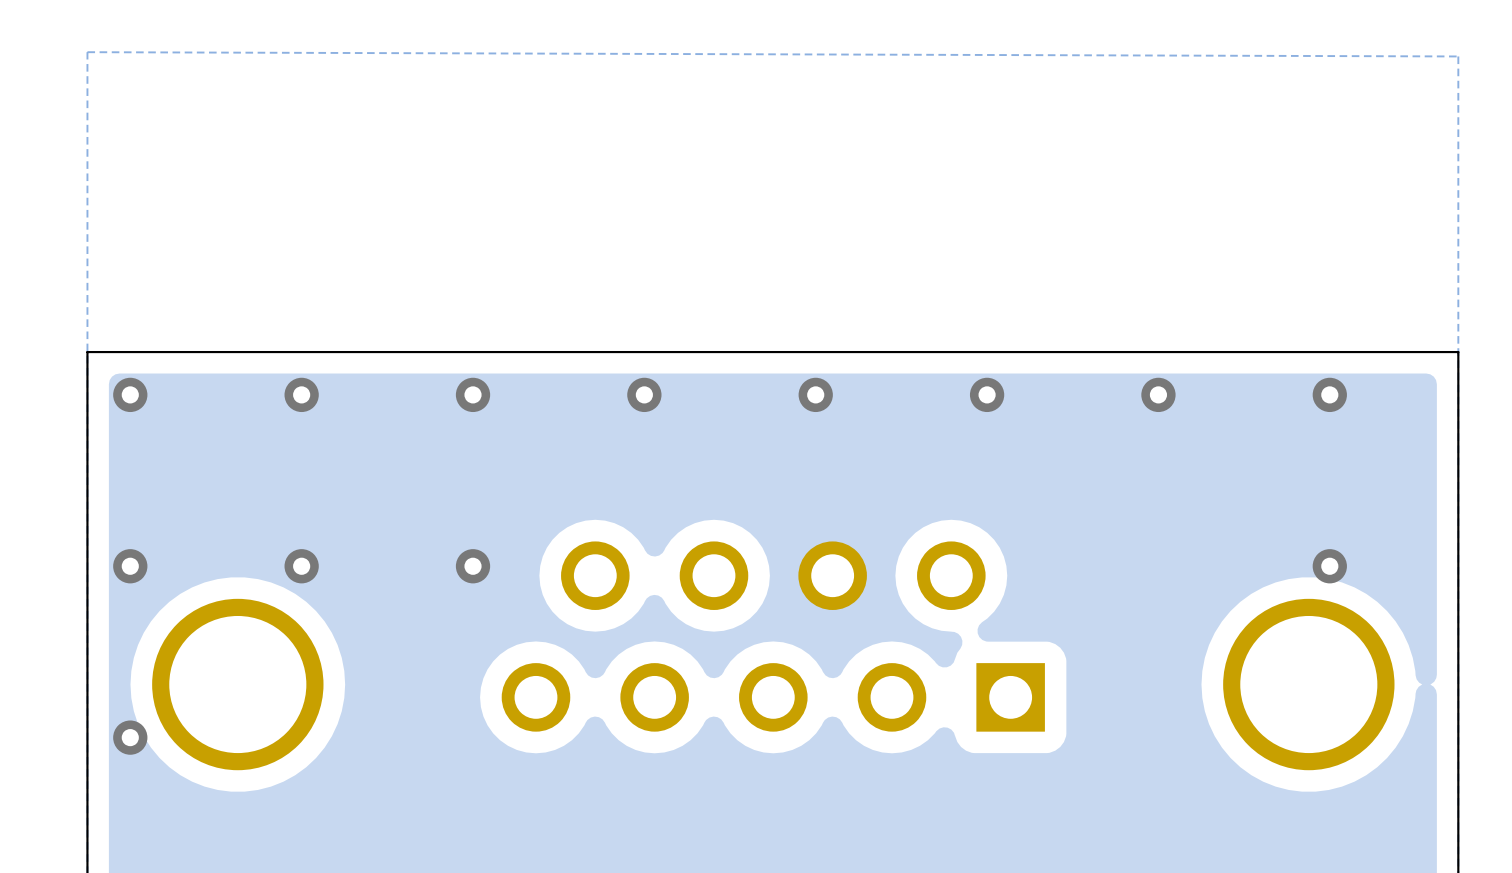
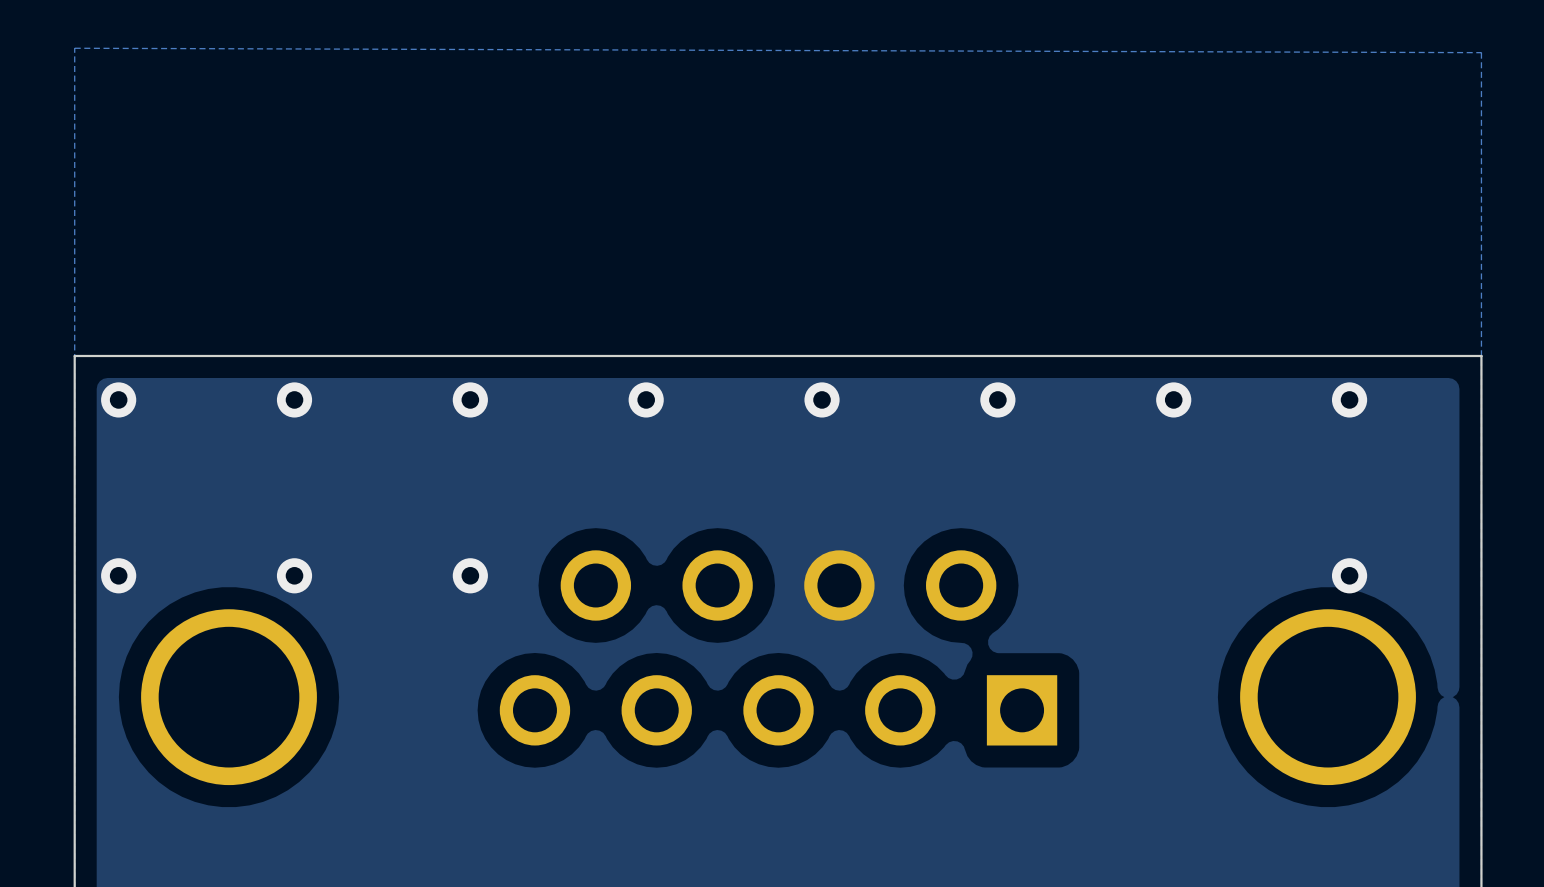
via: (130, 737) -> none

